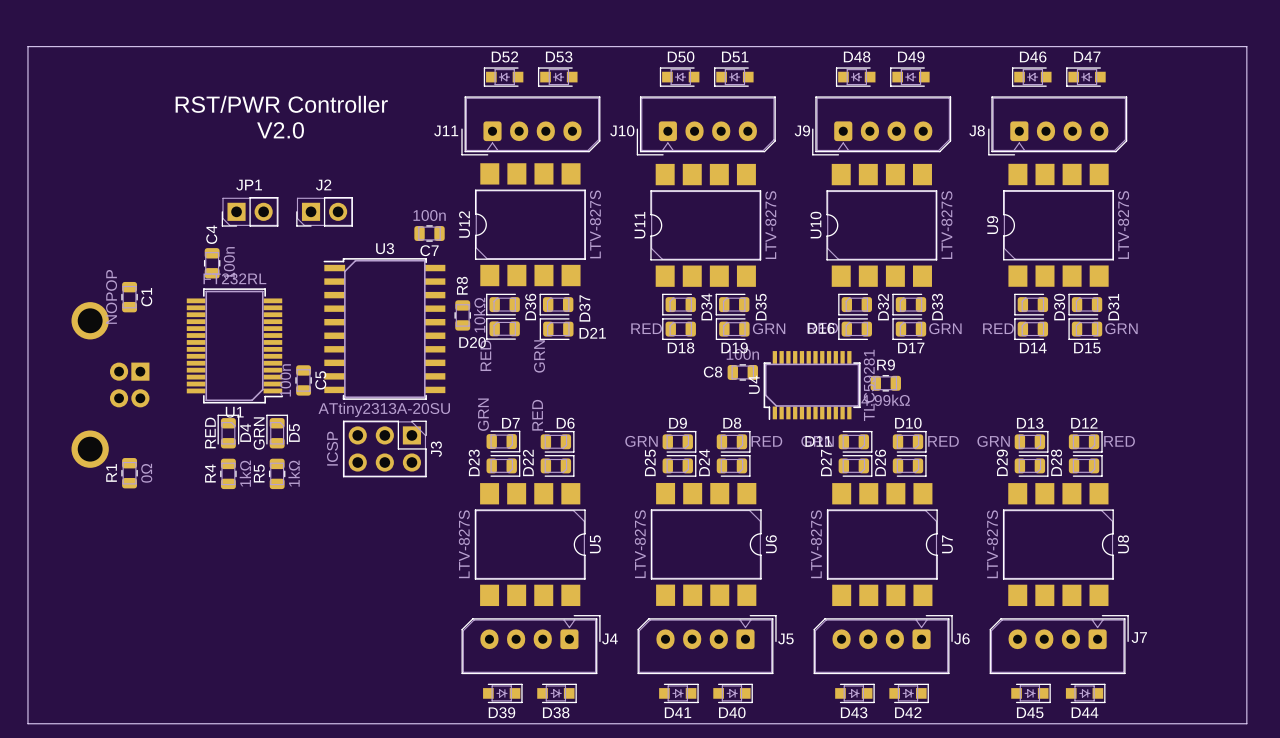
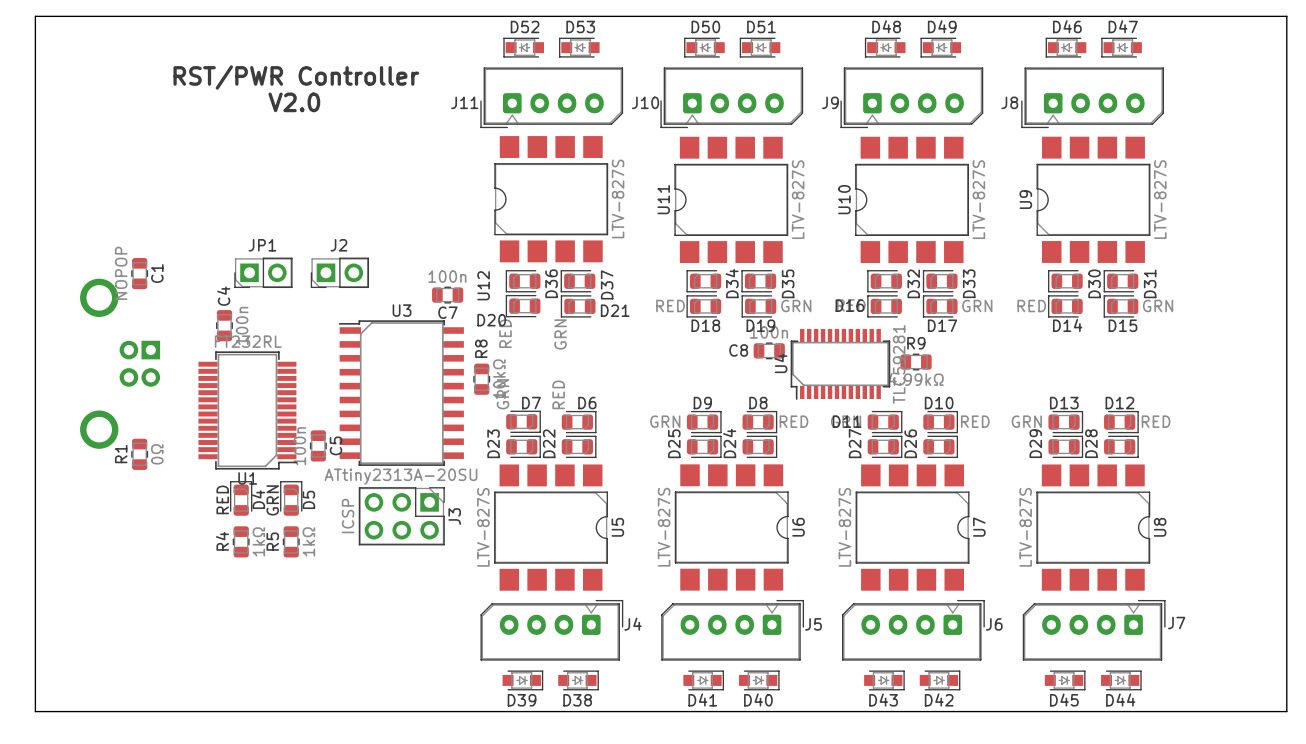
JP1 position: (250, 211) -> (263, 272)
J2 position: (324, 211) -> (339, 272)
U12 name position: U12 (464, 224) -> U12 (483, 285)
C7 position: (429, 233) -> (447, 295)
C4 position: (212, 263) -> (224, 325)
R8 position: (462, 315) -> (481, 379)
U3 position: (384, 328) -> (401, 393)
U1 position: (234, 345) -> (247, 410)
C5 position: (303, 380) -> (318, 445)
D4 position: (228, 431) -> (241, 498)
D5 position: (277, 431) -> (291, 498)
J3 position: (384, 448) -> (401, 516)
R4 position: (228, 473) -> (241, 541)
R5 position: (277, 473) -> (291, 541)

